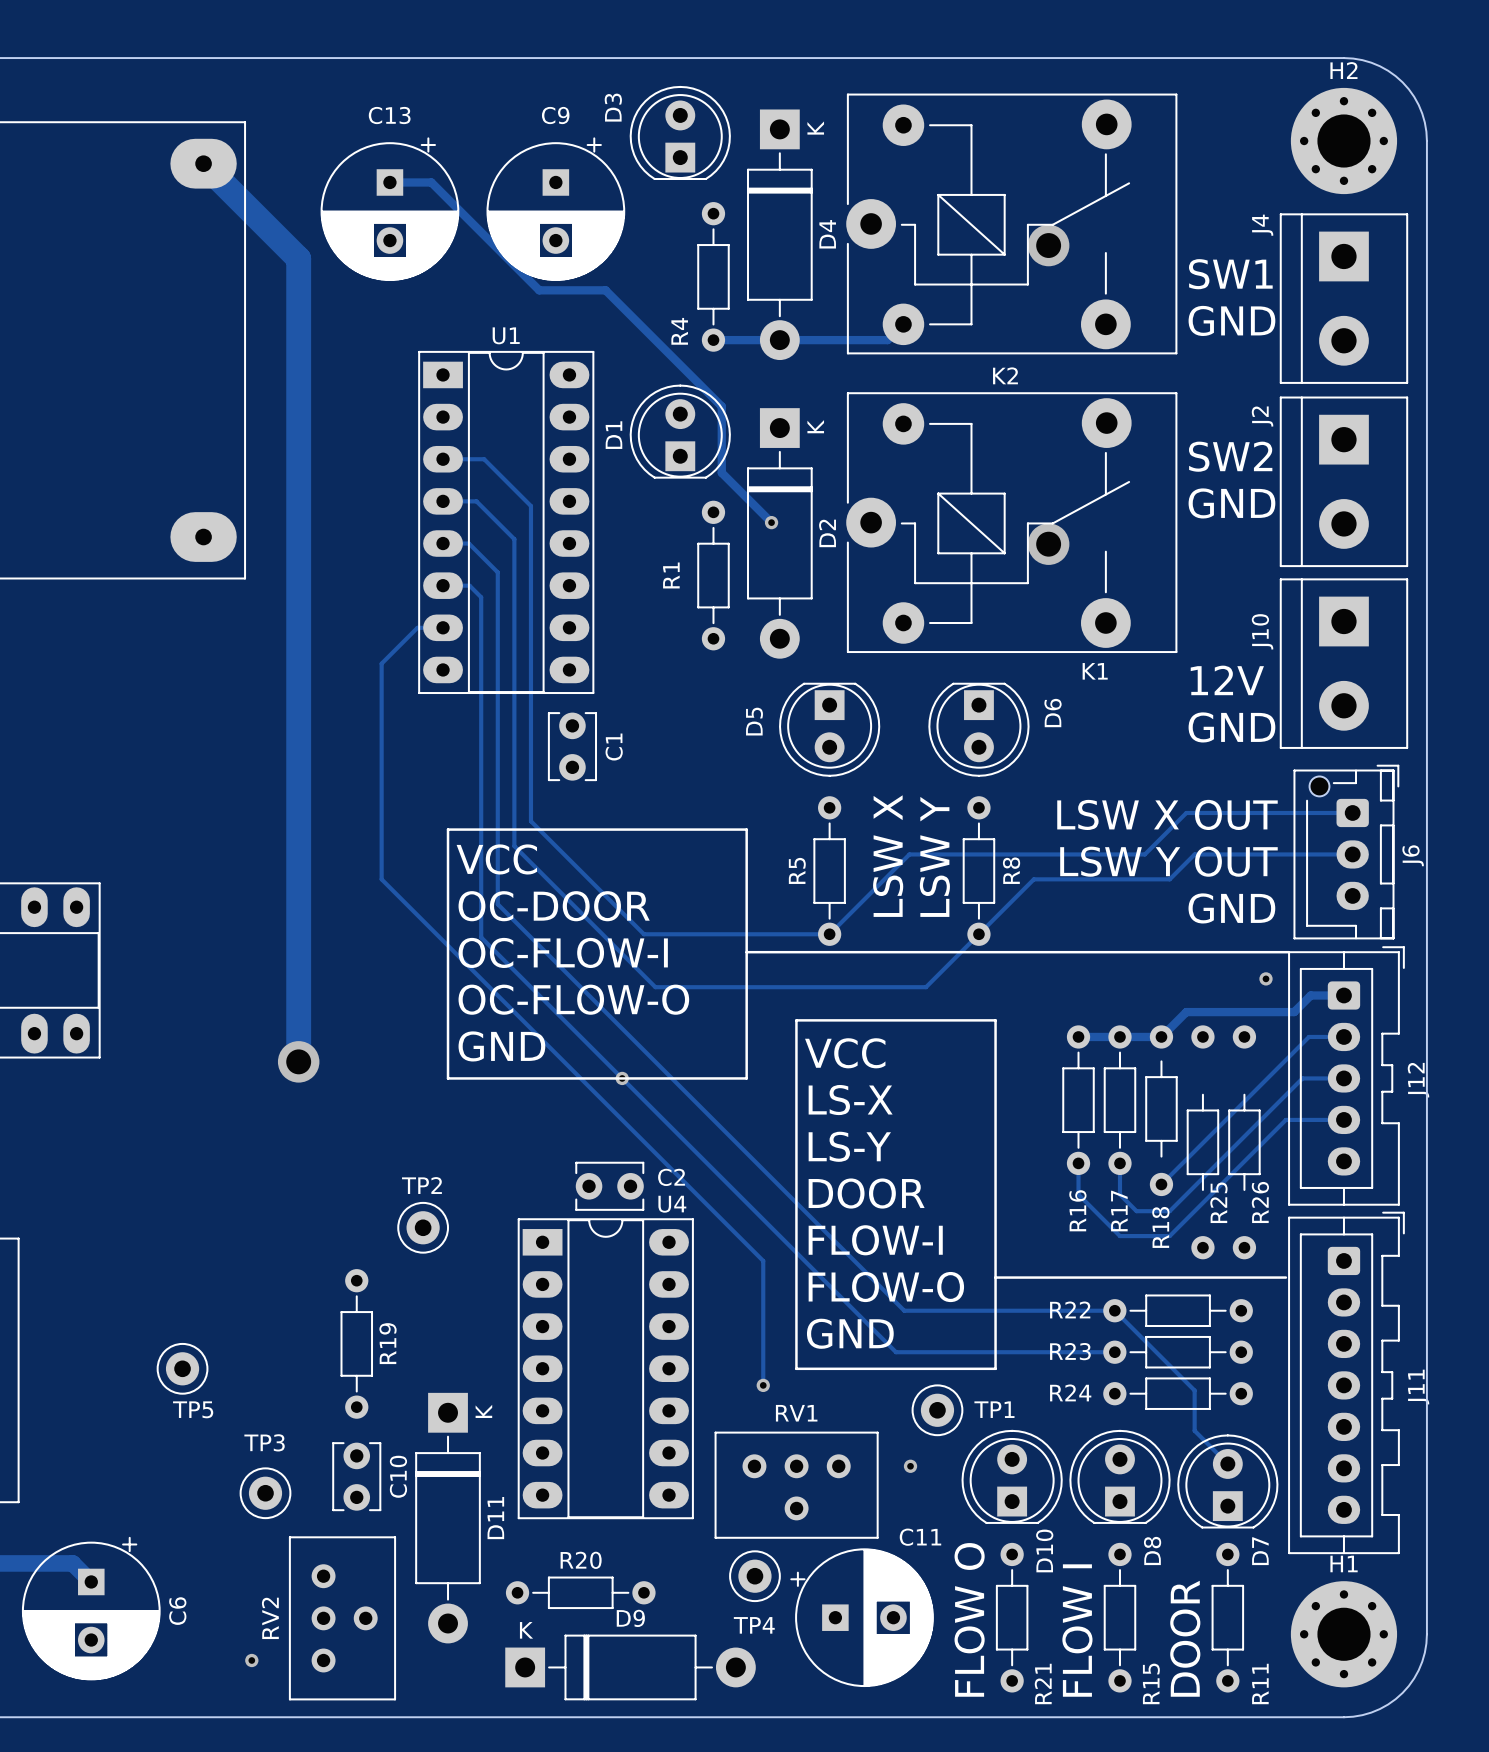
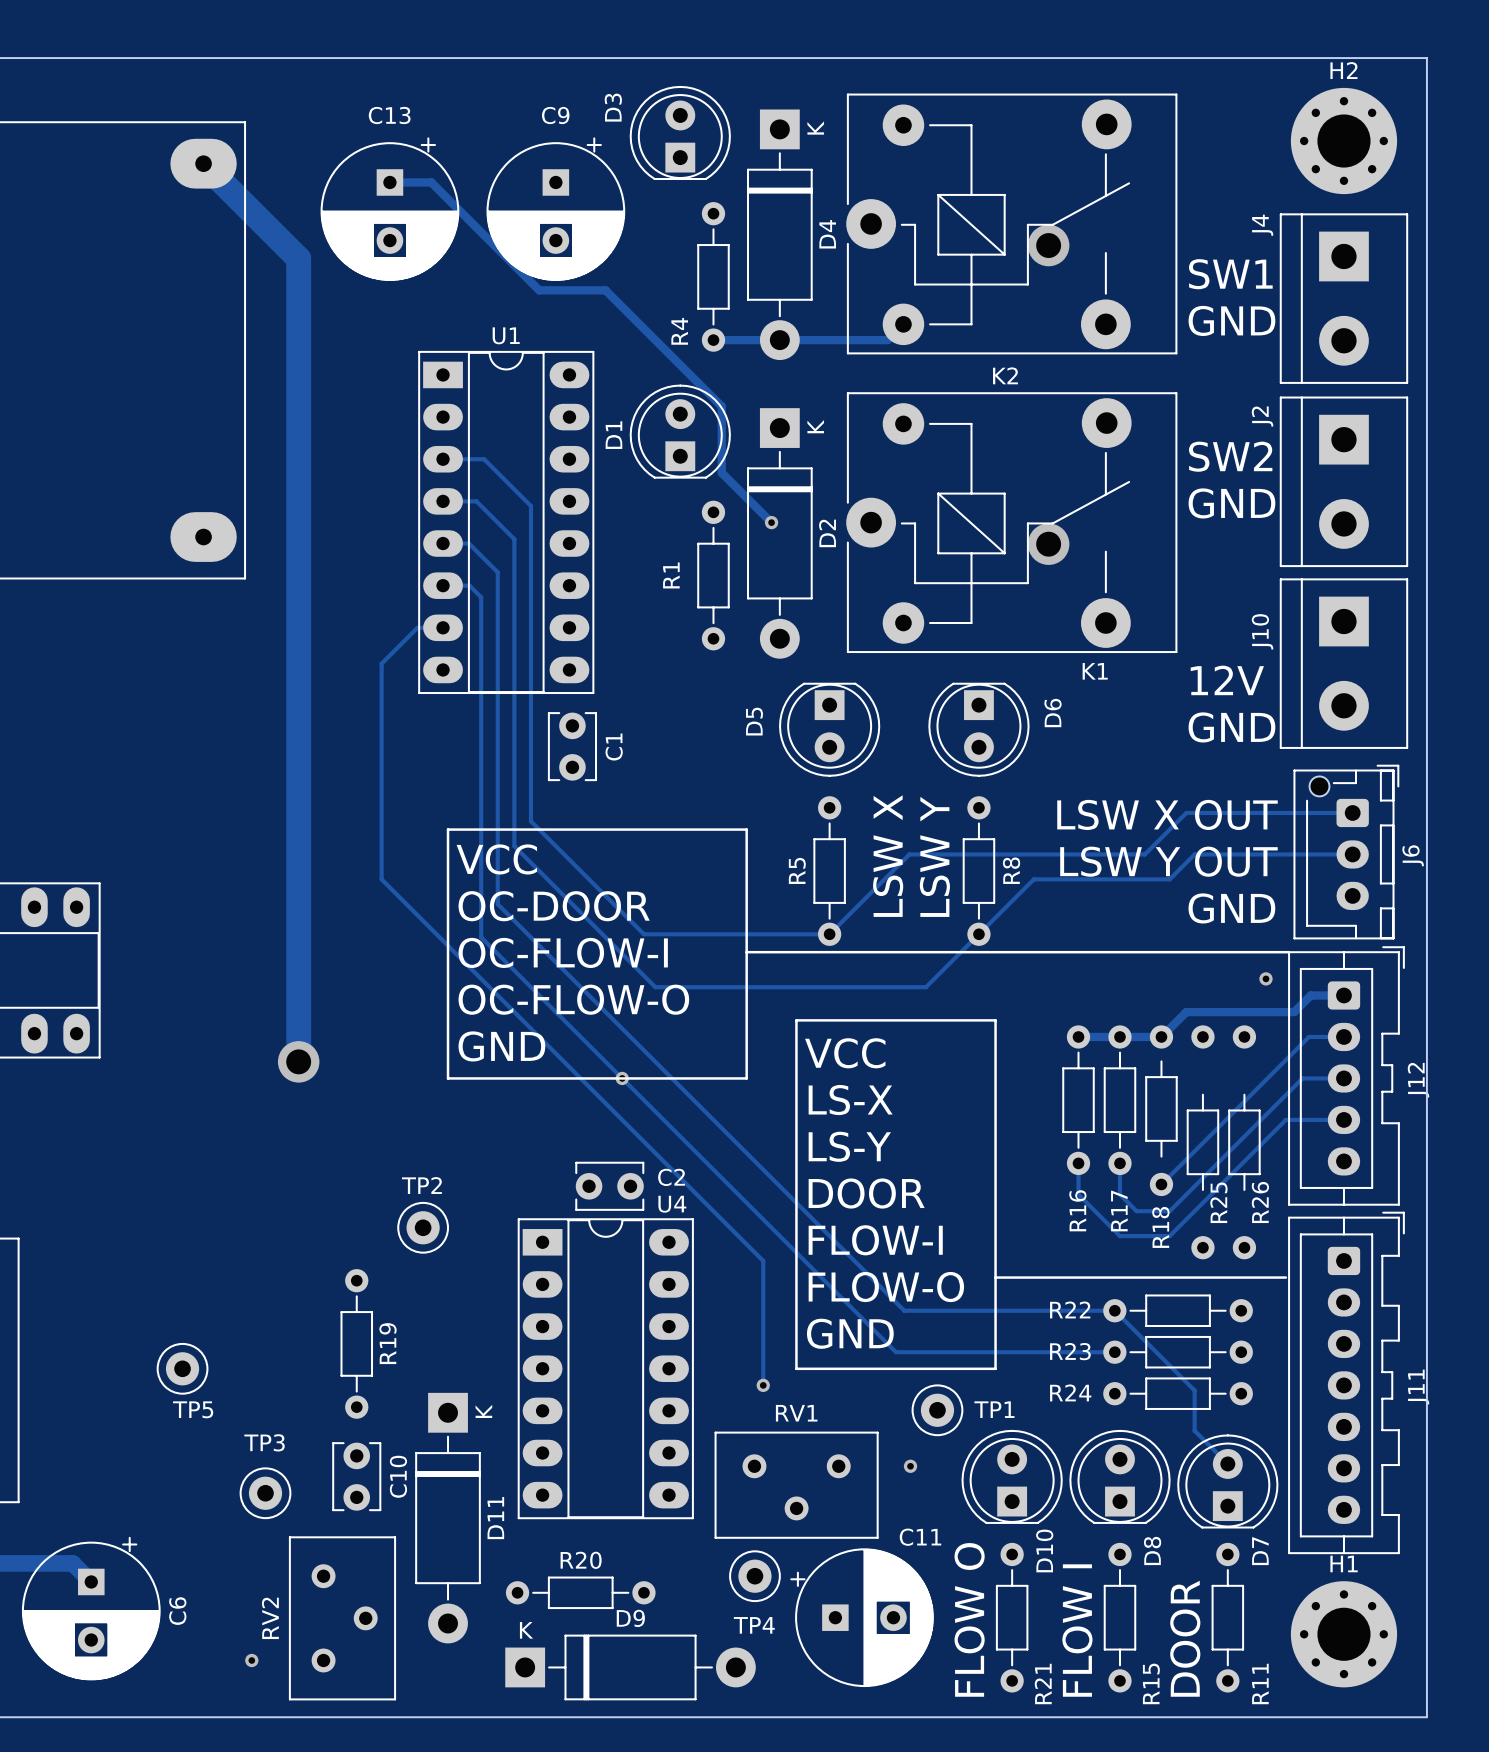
board edge: (1343, 58) (1371, 62) (1388, 70) (1402, 82) (1418, 105) (1424, 122) (1426, 141) -> (1343, 58) (1426, 58) (1426, 141)
RV1 footprint: [714, 1431, 879, 1539] -> [714, 1431, 879, 1539]
RV2 footprint: [288, 1536, 397, 1701] -> [288, 1536, 397, 1701]
board edge: (1426, 1634) (1422, 1661) (1414, 1678) (1402, 1692) (1379, 1709) (1362, 1715) (1343, 1717) -> (1426, 1634) (1426, 1717) (1343, 1717)

